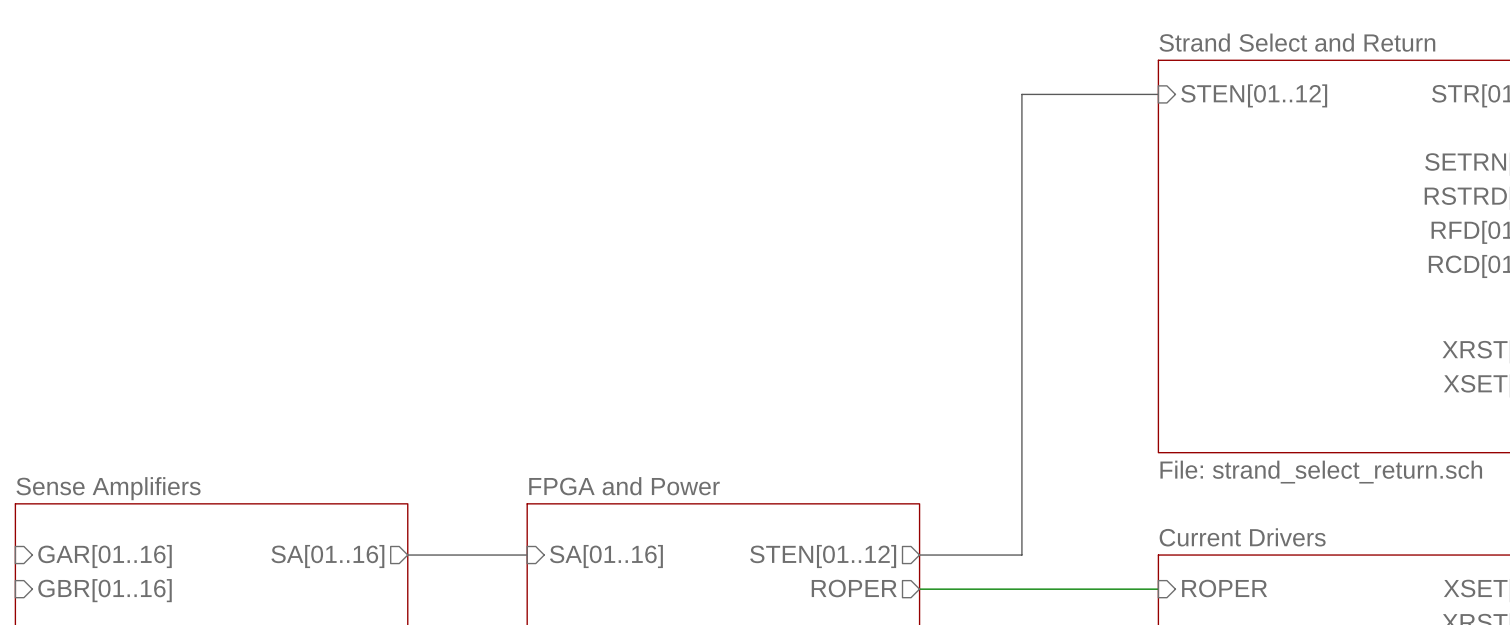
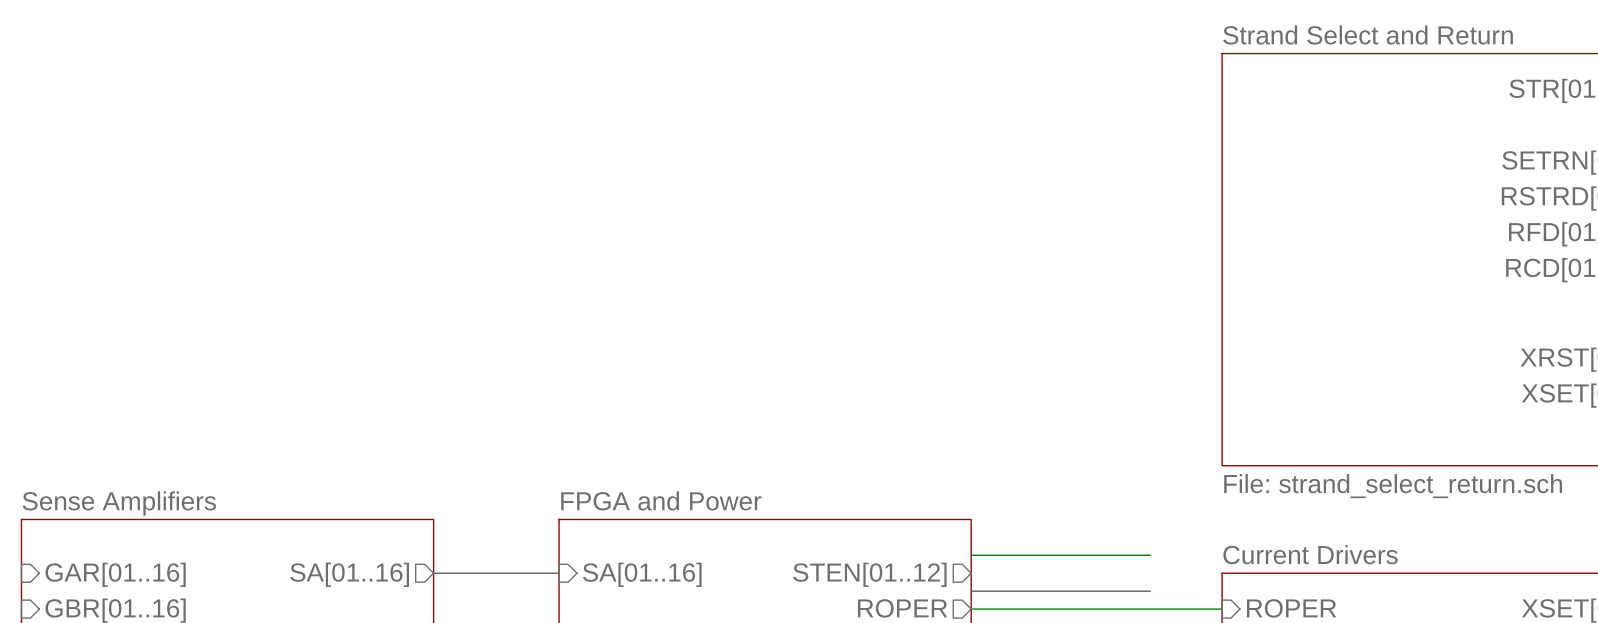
bus: (1158, 94) (1021, 94) (1021, 555) (919, 555) -> none
sheet pin: STEN[01..12] (1254, 95) -> none
wire: none -> (971, 555) (1150, 555)
bus: none -> (971, 591) (1150, 591)

